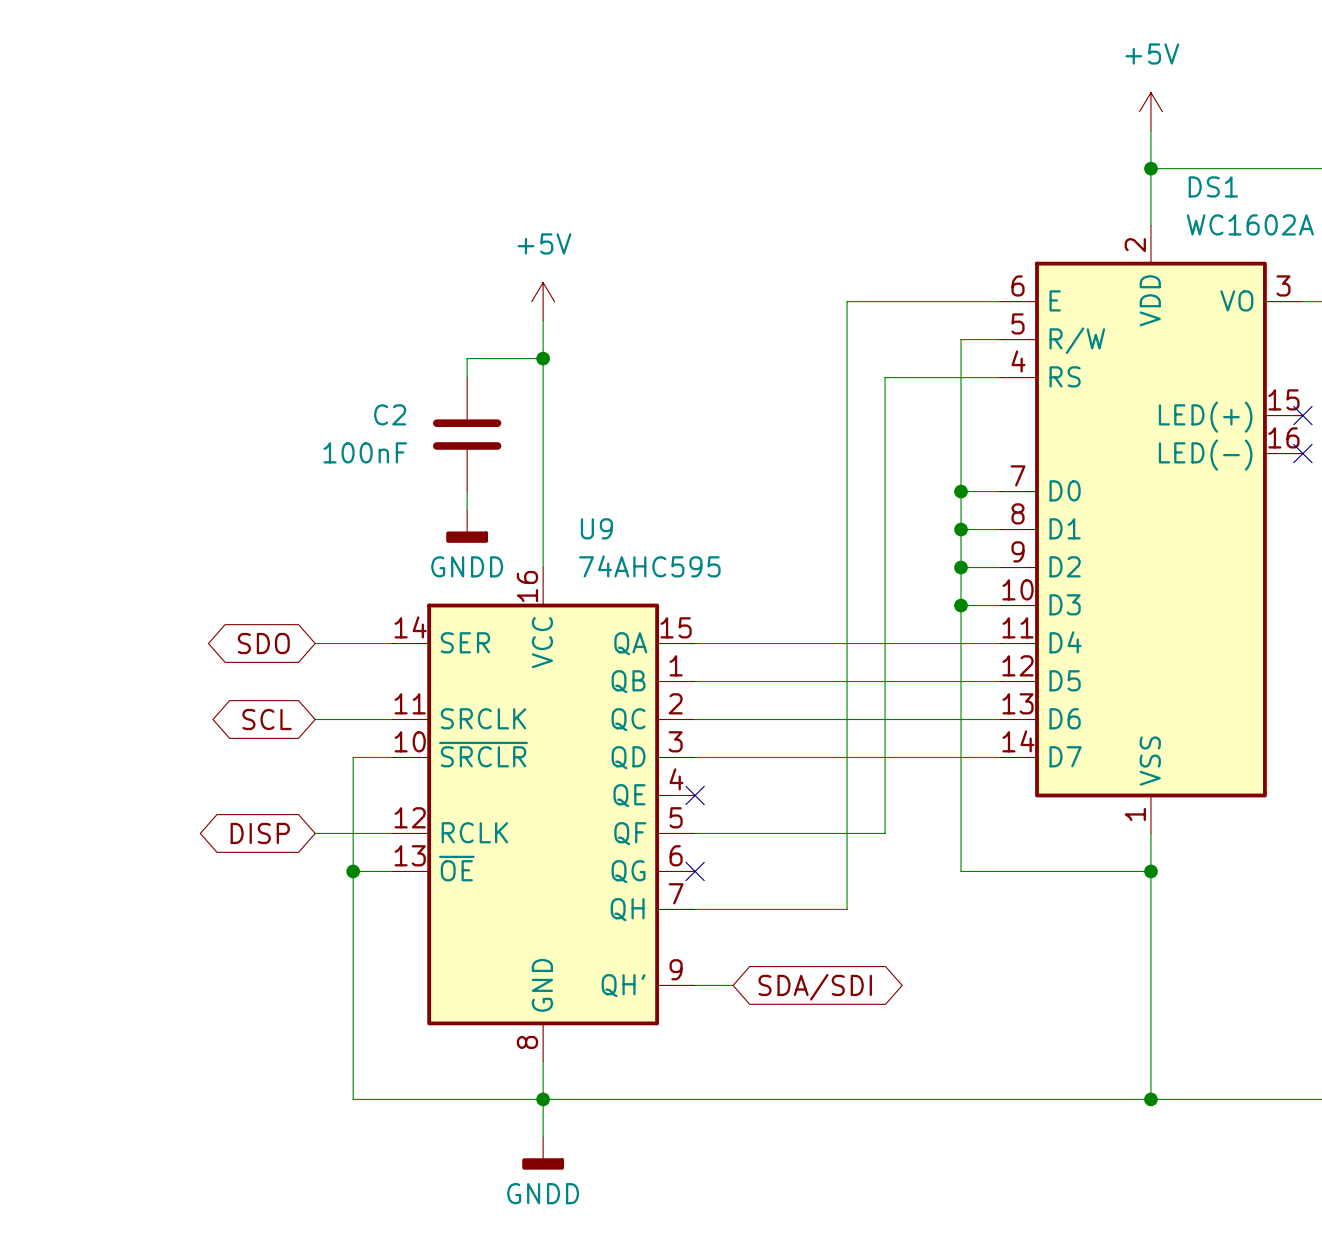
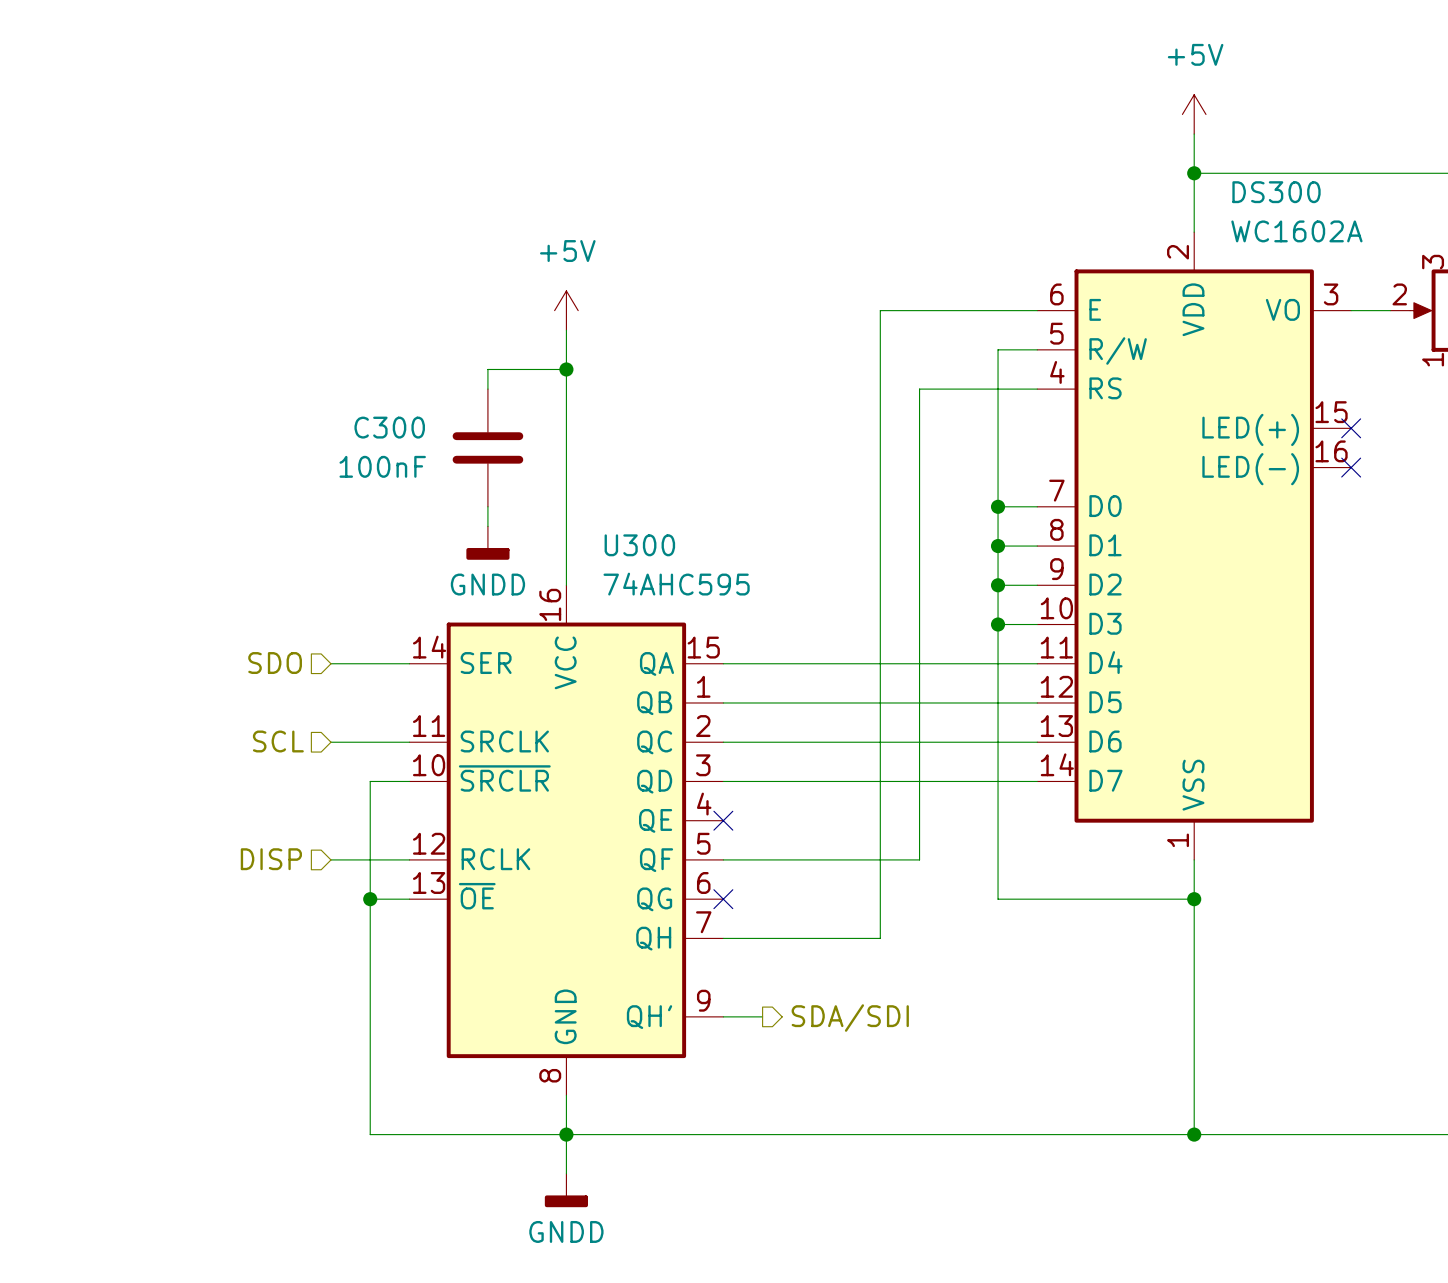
DS1 name: DS1 (1213, 186) -> DS300 (1276, 192)
C2 name: C2 (390, 414) -> C300 (389, 427)
U9 name: U9 (596, 528) -> U300 (639, 545)
hierarchical label: none -> SDO (275, 663)
global label: SDO (263, 643) -> none
hierarchical label: none -> SCL (278, 741)
global label: SCL (267, 719) -> none
hierarchical label: none -> DISP (271, 859)
global label: DISP (260, 833) -> none
hierarchical label: none -> SDA/SDI (850, 1018)
global label: SDA/SDI (815, 987) -> none

